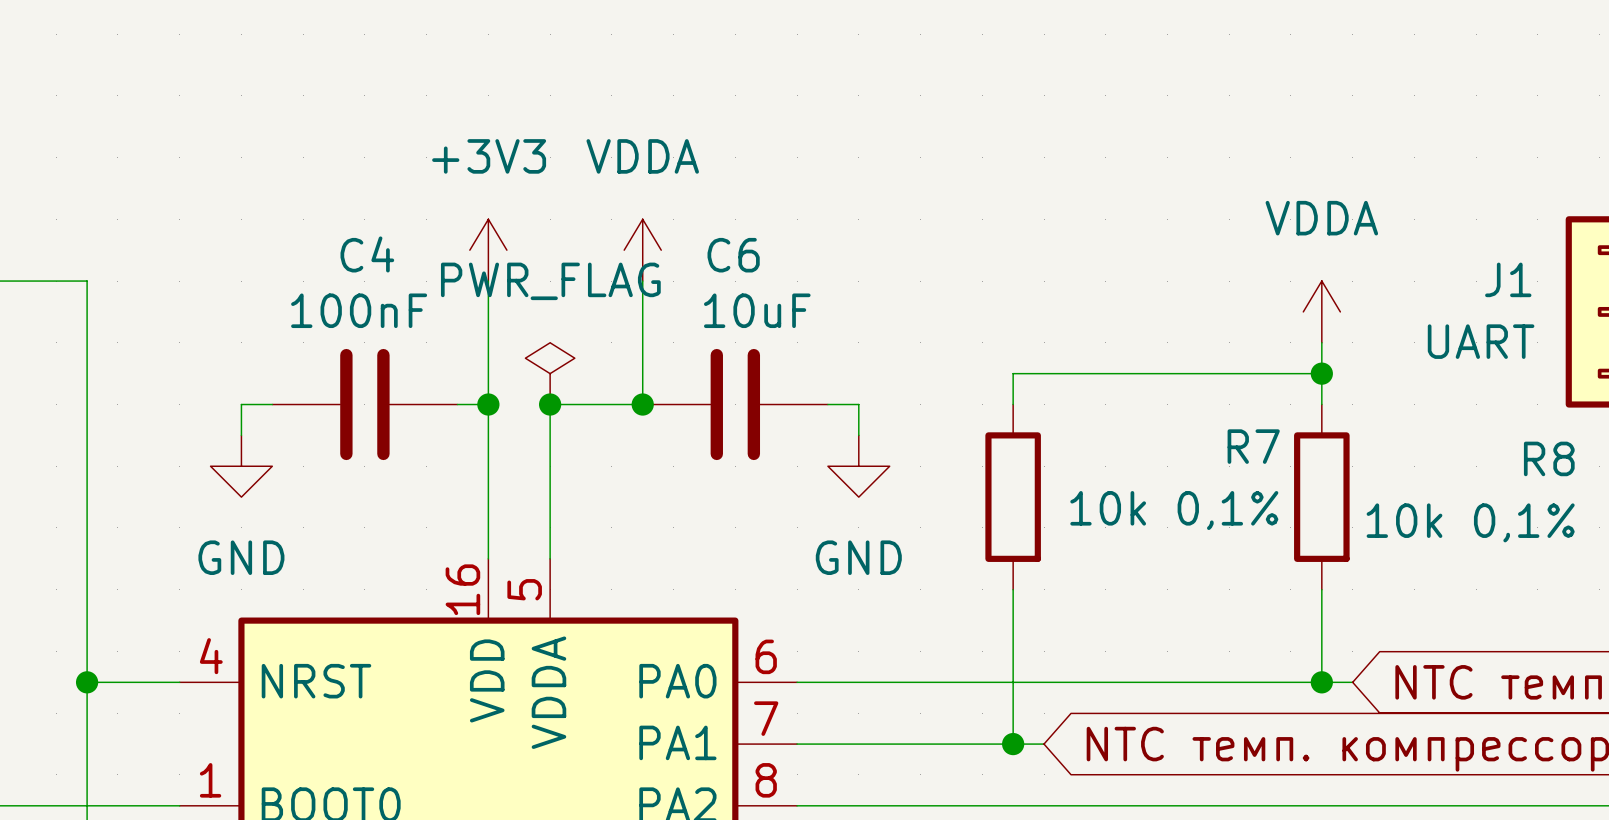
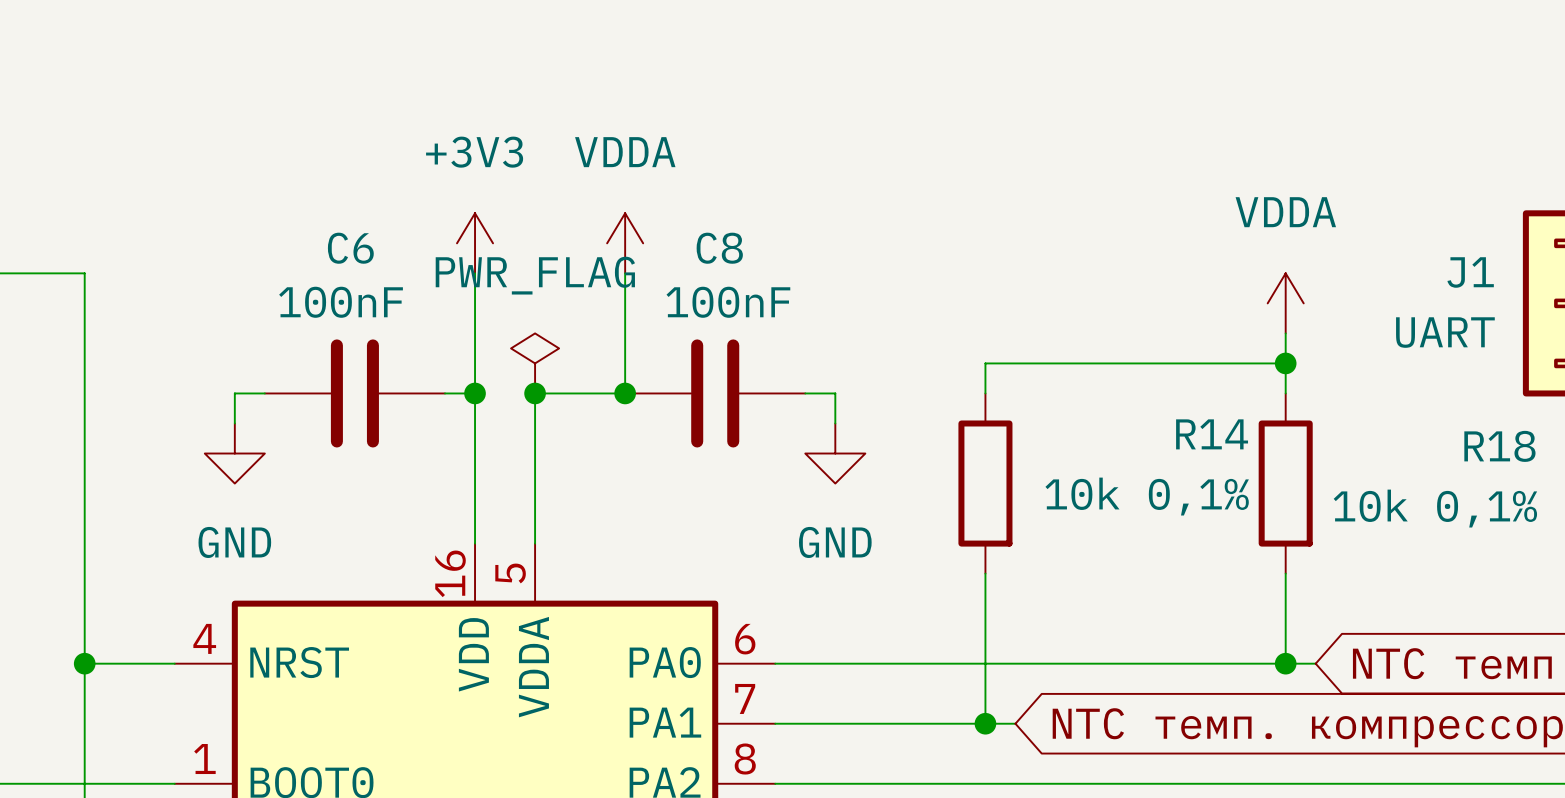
C4 name: C4 (367, 254) -> C6 (350, 248)
C6 name: C6 (733, 255) -> C8 (719, 248)
C6 value: 10uF (757, 310) -> 100nF (728, 302)
R7 name: R7 (1253, 446) -> R14 (1212, 434)
R8 name: R8 (1549, 458) -> R18 (1499, 446)

